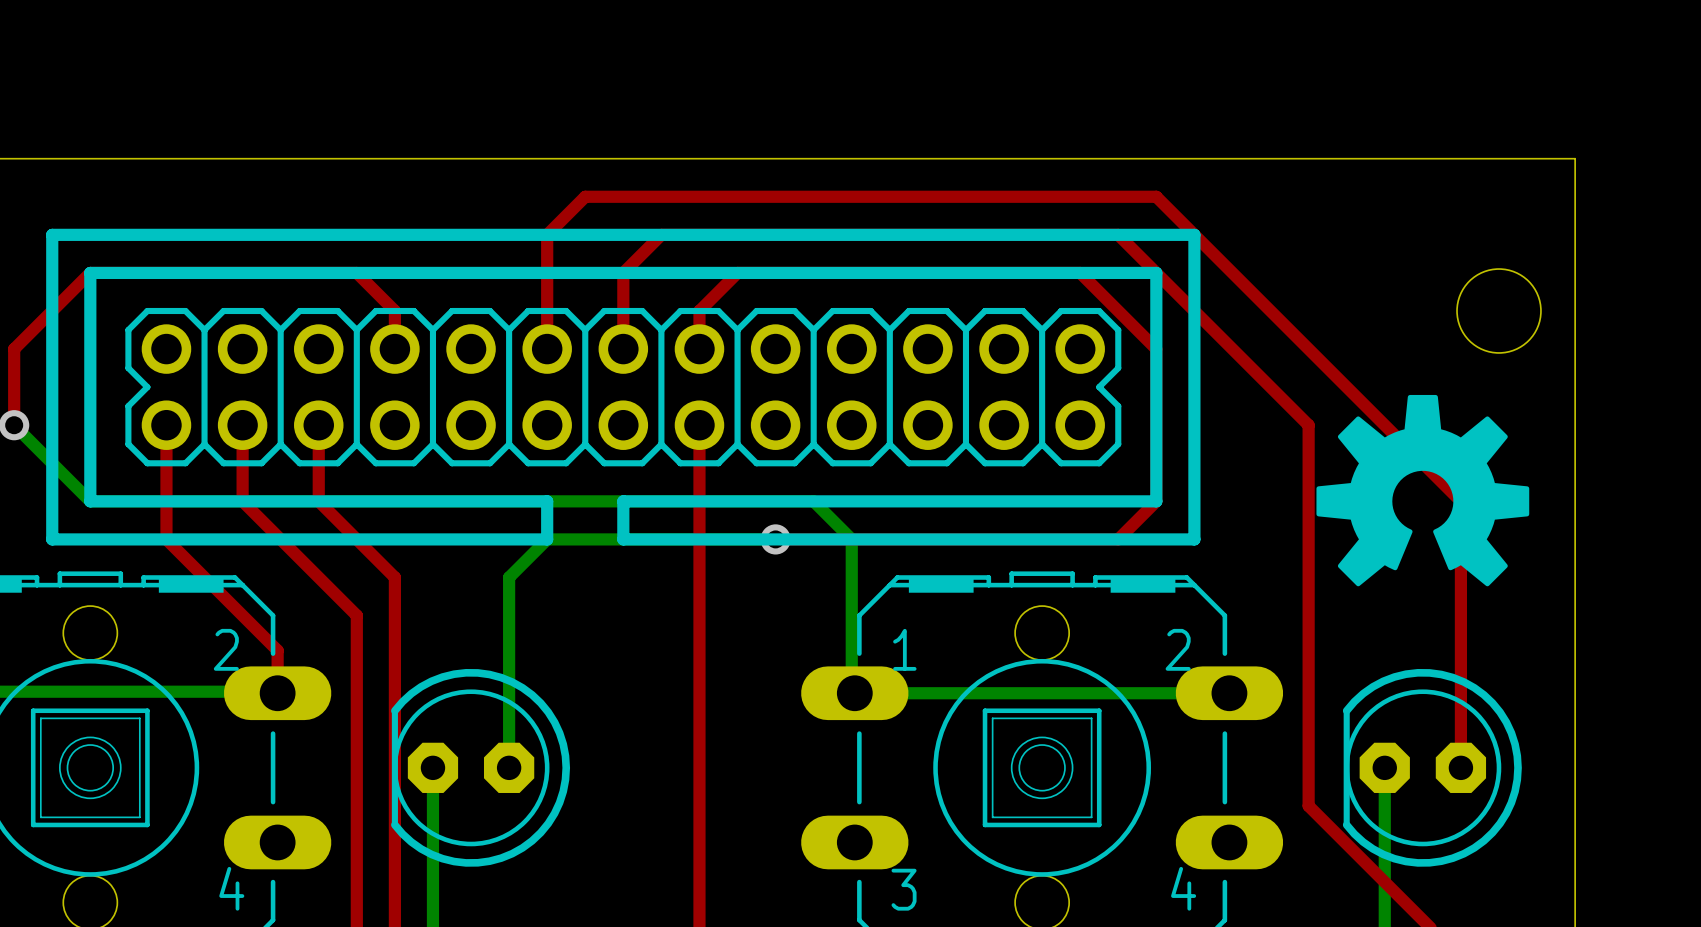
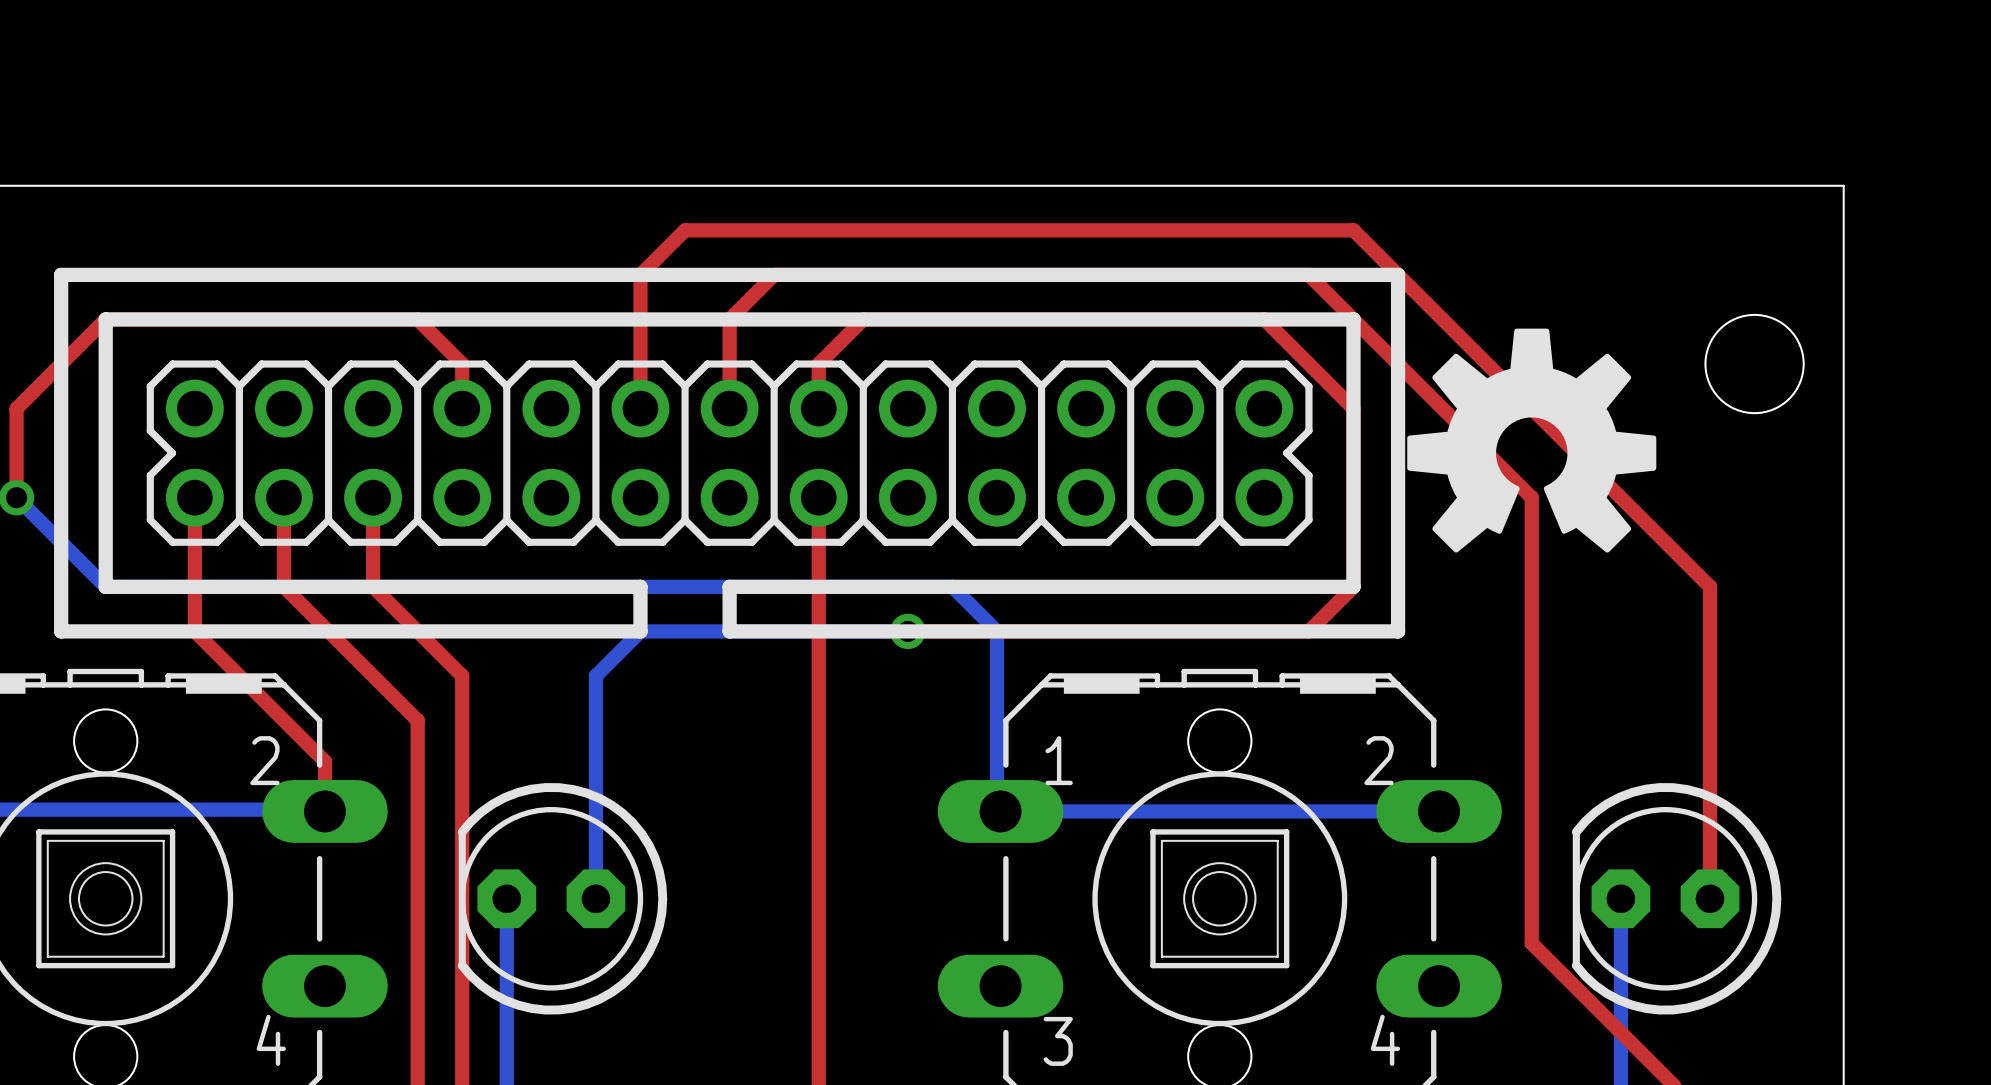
drawing position: (1422, 490) -> (1531, 440)

